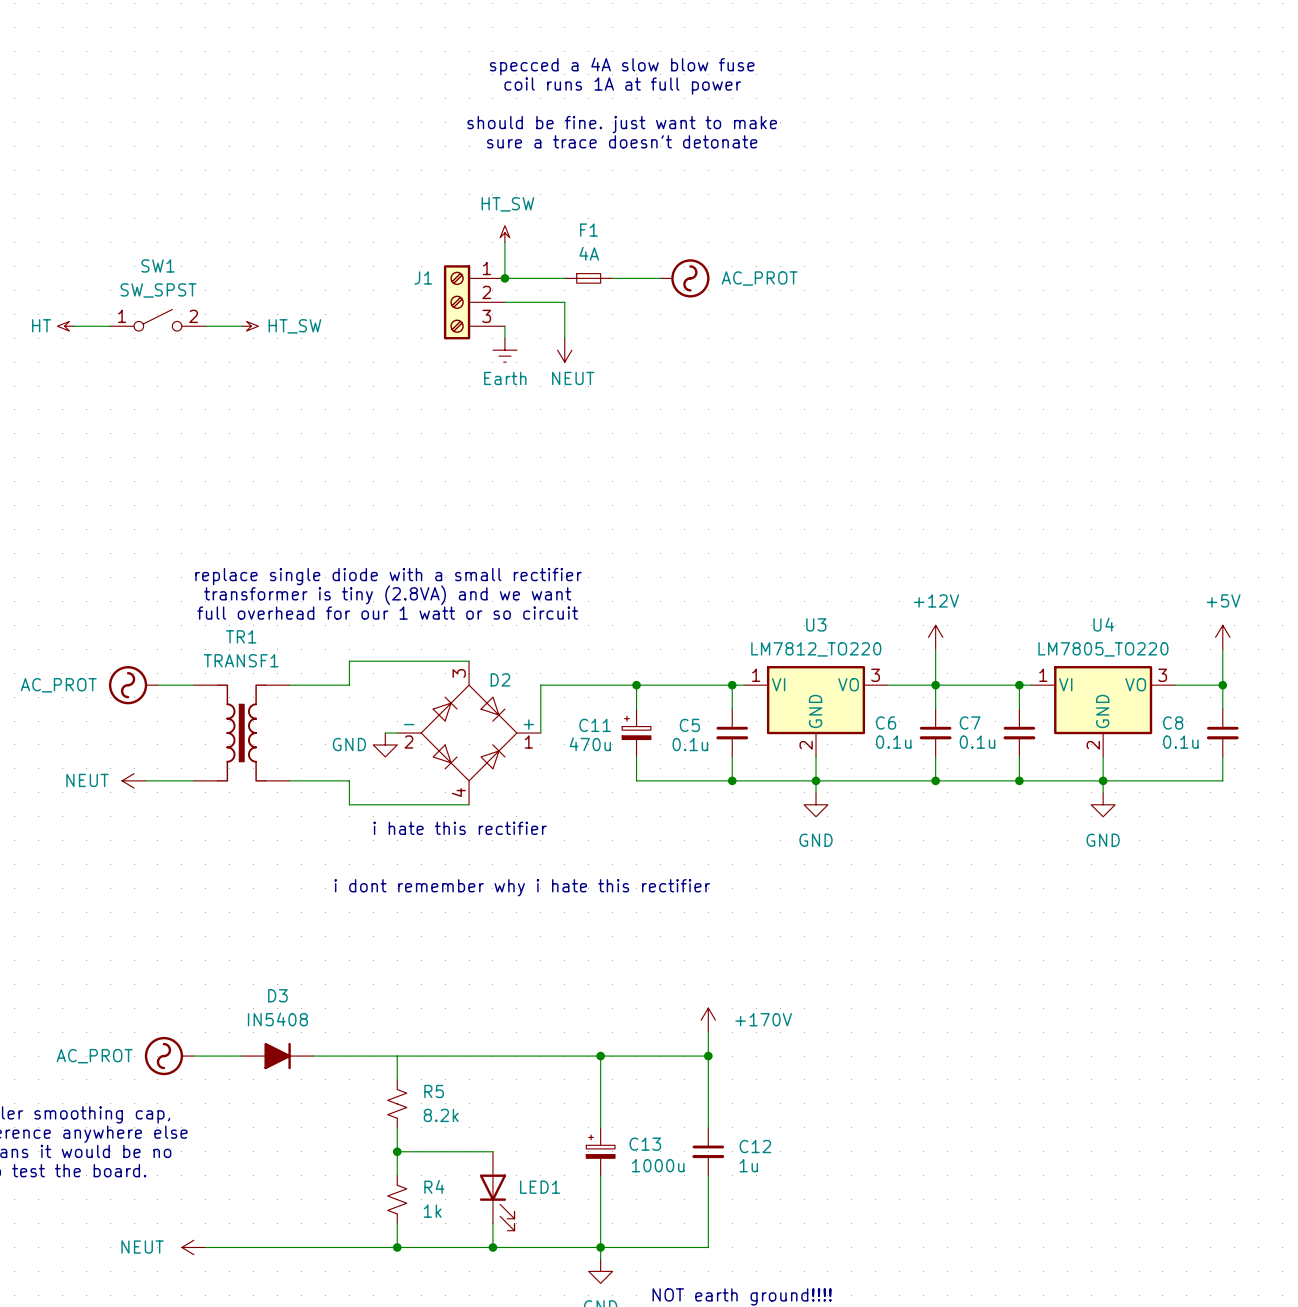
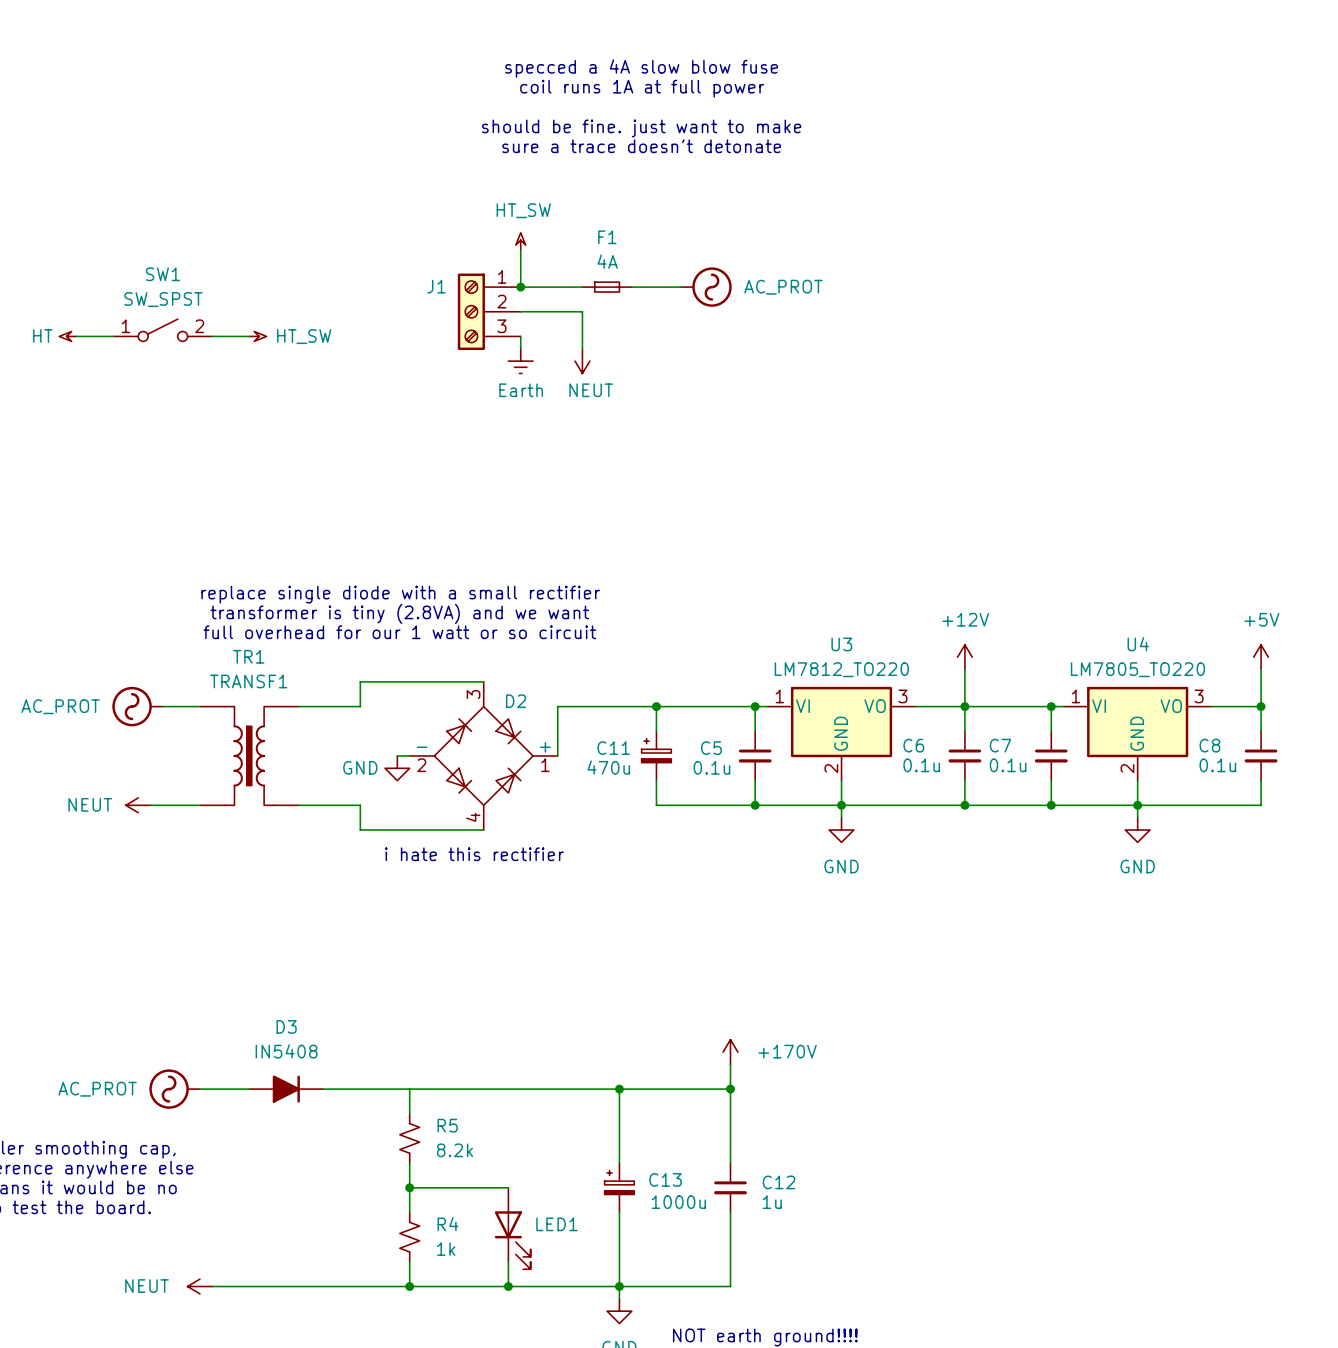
text: i dont remember why i hate this rectifier (522, 887) -> none

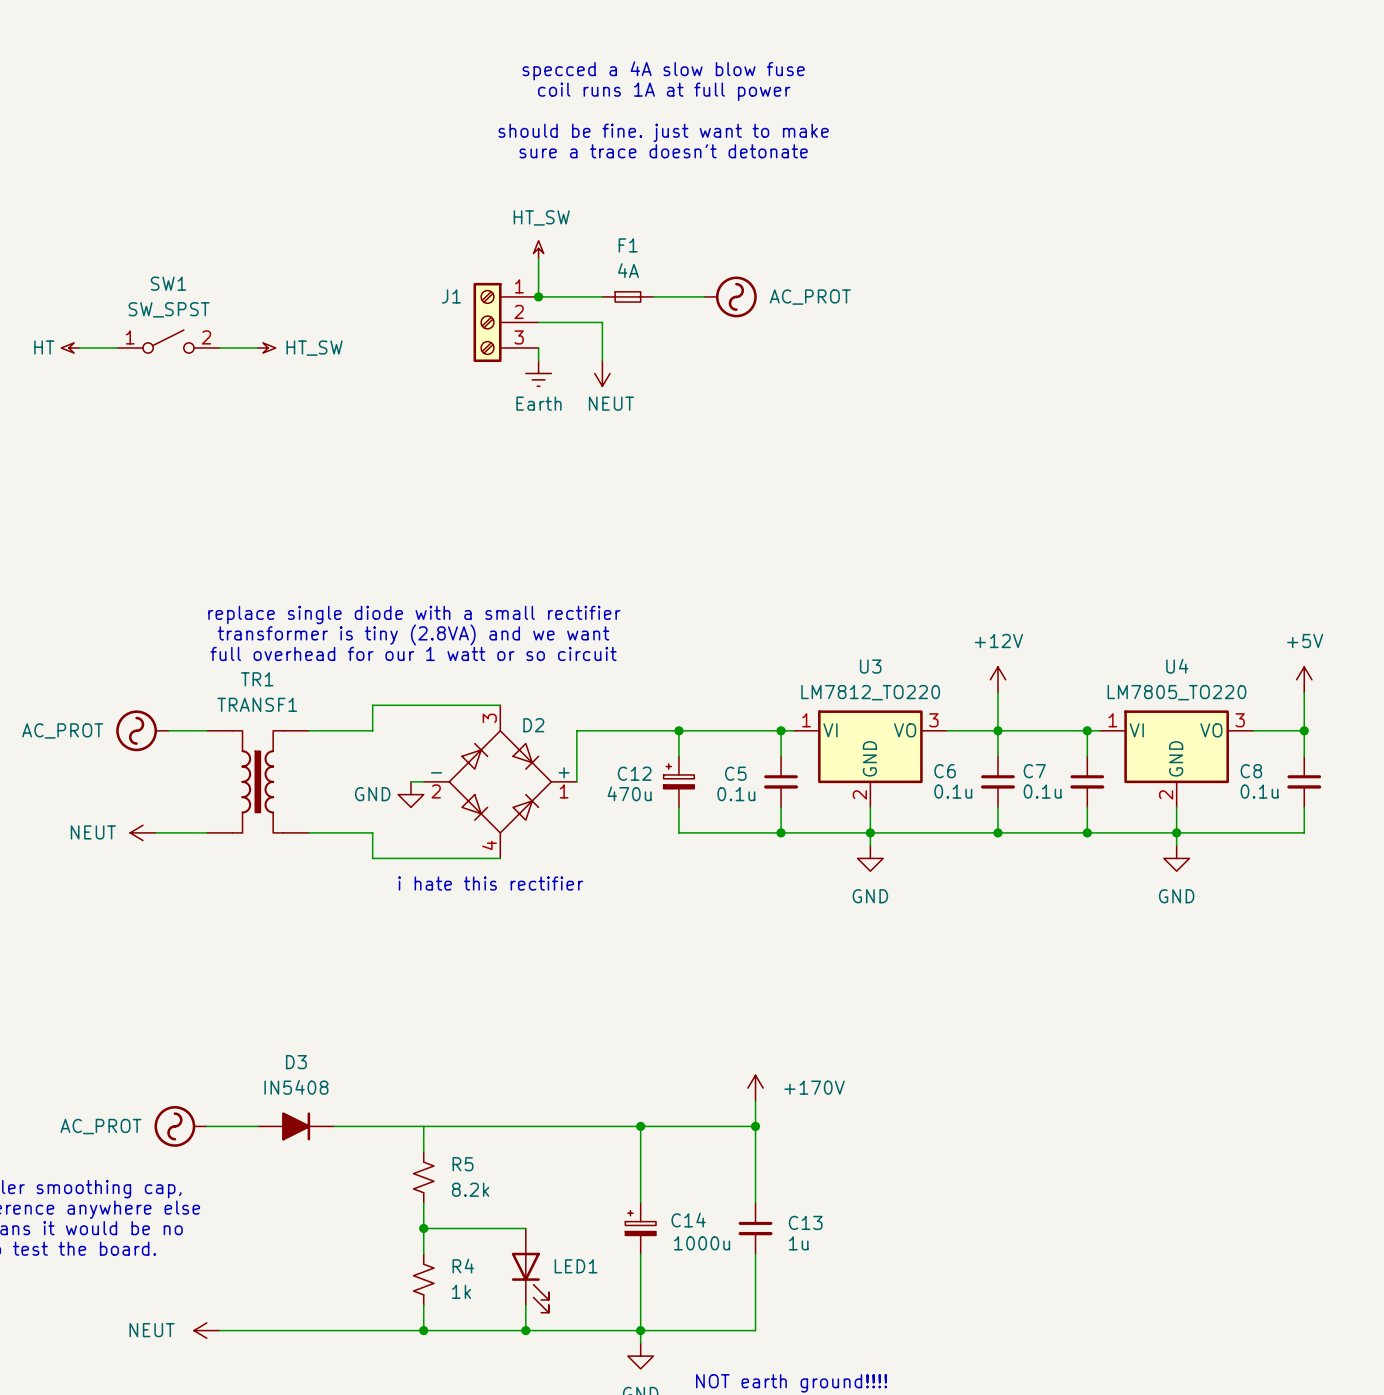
C11 name: C11 (613, 748) -> C12 (634, 773)
C13 name: C13 (665, 1179) -> C14 (688, 1220)
C12 name: C12 (779, 1182) -> C13 (805, 1222)

